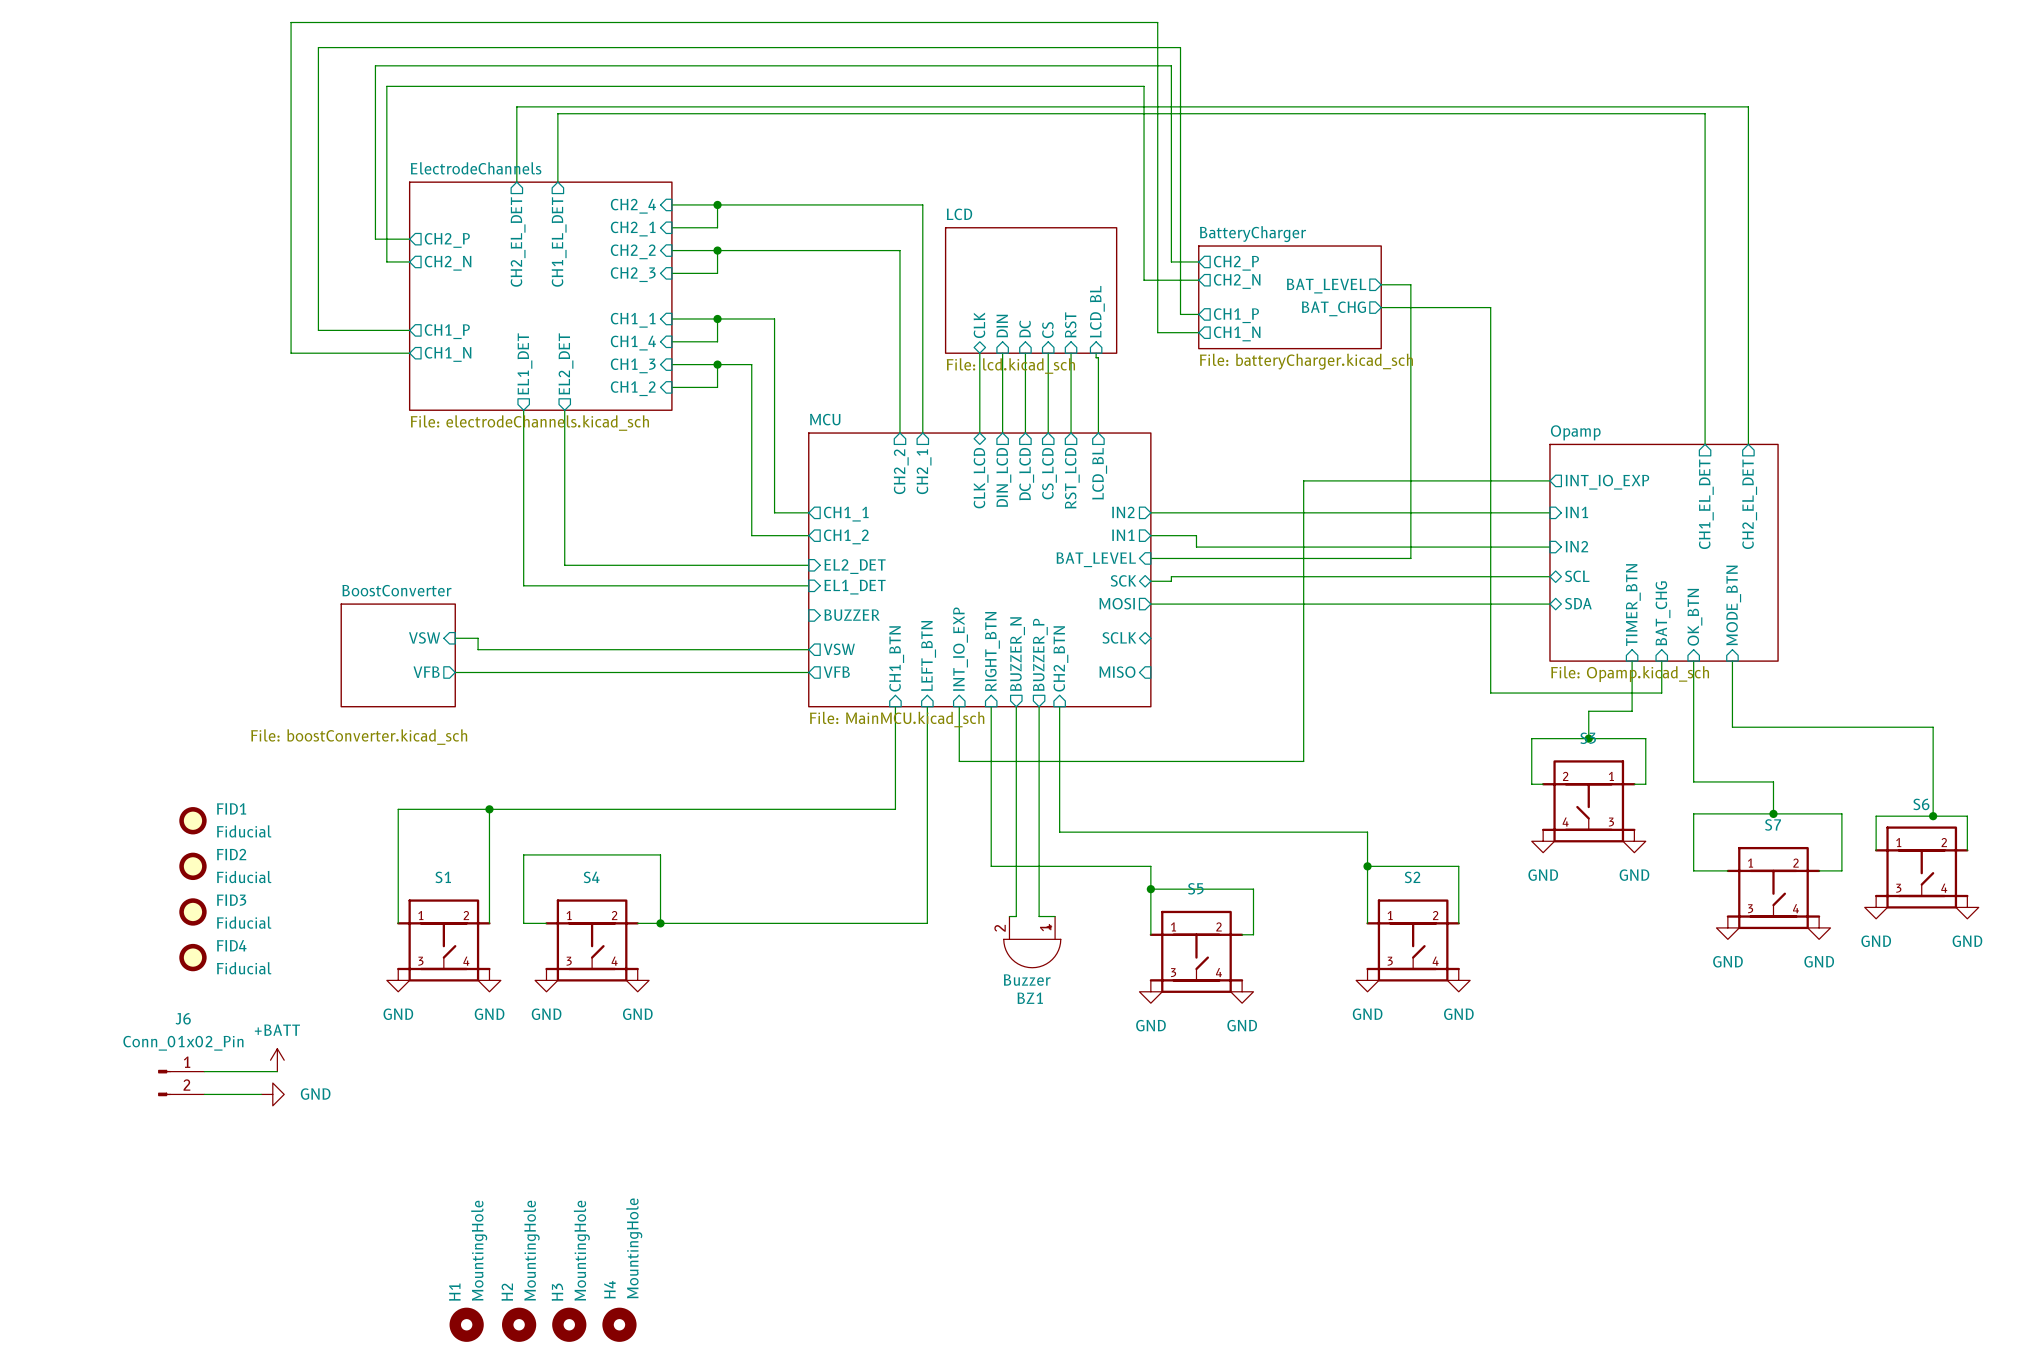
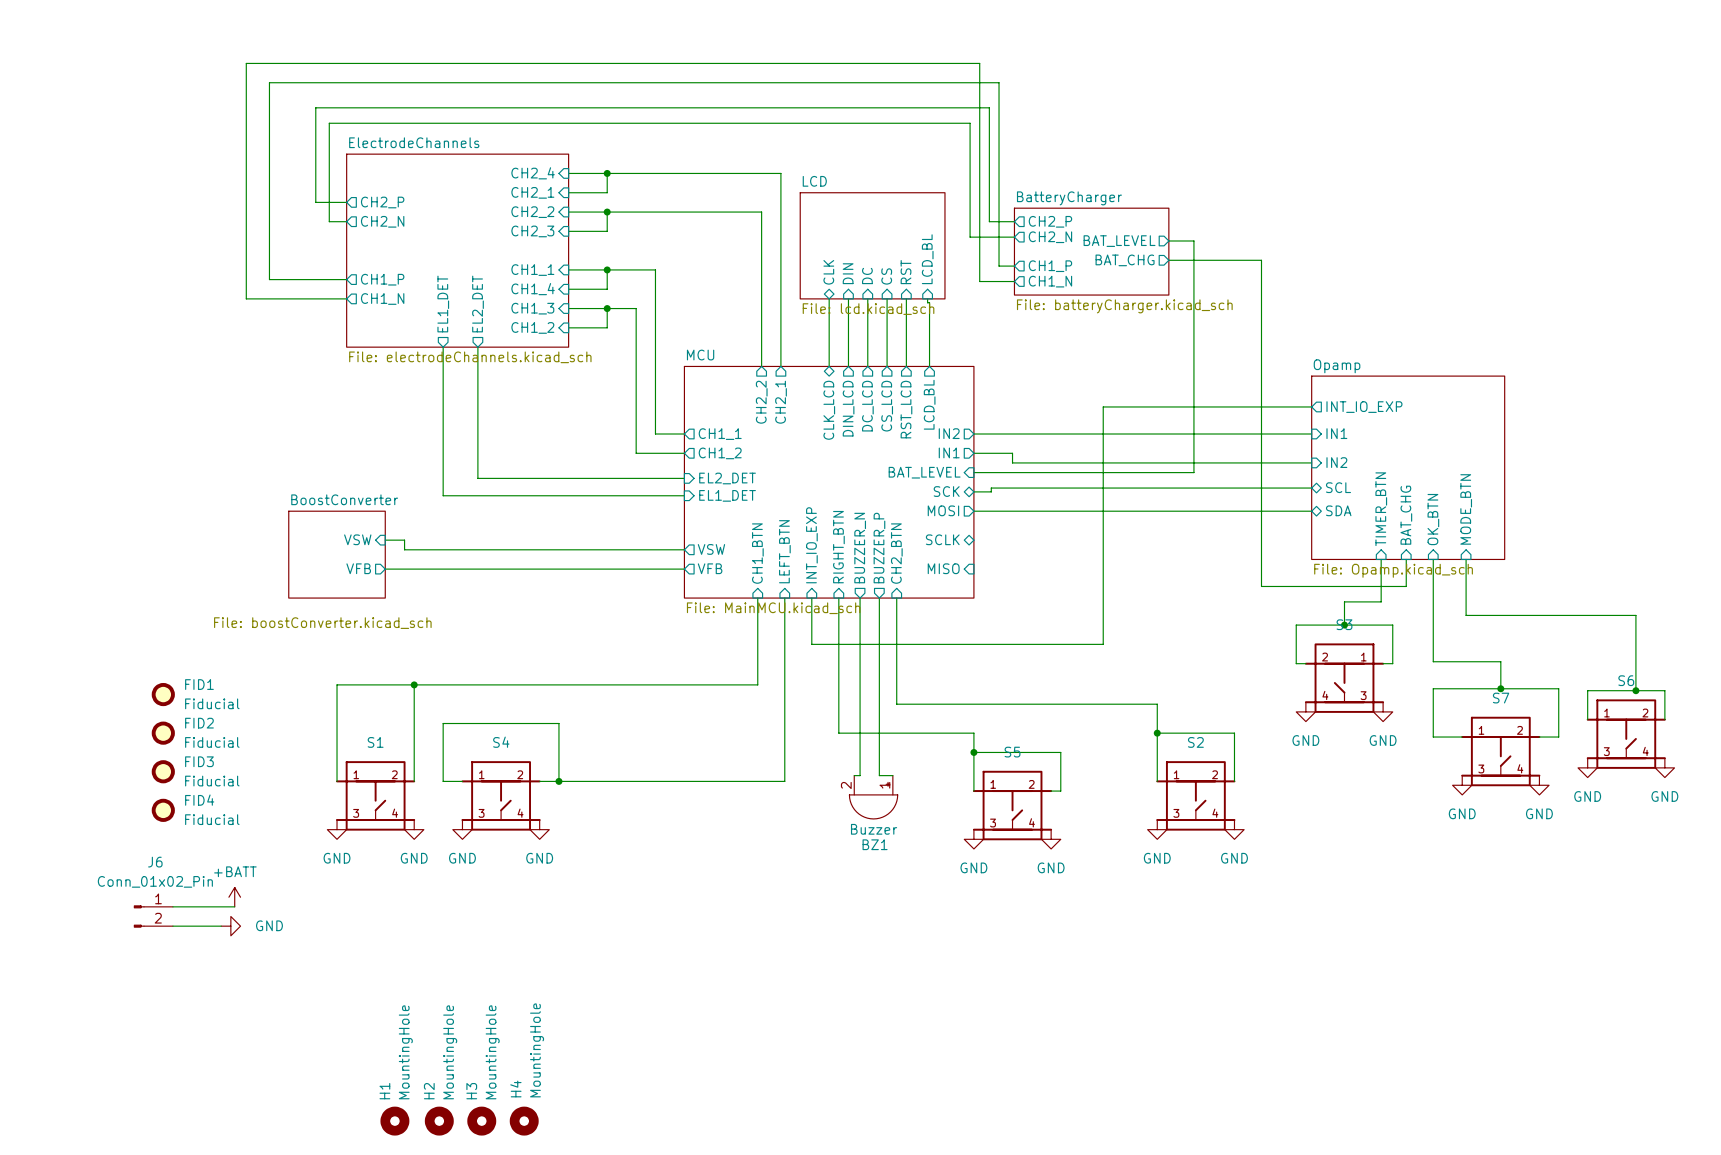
wire: (291, 74) (291, 22) (1157, 22) (1157, 74) -> (246, 63) (979, 63)
wire: (318, 97) (318, 47) (1180, 47) (1180, 97) -> (269, 82) (999, 82)
wire: (516, 182) (516, 106) (1748, 106) (1748, 444) -> none
wire: (557, 182) (557, 113) (1705, 113) (1705, 444) -> none
wire: (375, 239) (375, 65) (1171, 65) (1171, 261) -> (317, 202) (315, 202) (315, 107) (989, 107) (989, 221) (991, 221)
sheet pin: CH2_EL_DET (518, 242) -> none
sheet pin: CH1_EL_DET (559, 242) -> none
wire: (389, 261) (386, 261) (386, 86) (1144, 86) (1144, 280) (1146, 280) -> (329, 221) (329, 123) (970, 123) (970, 237)
sheet pin: CH1_EL_DET (1706, 504) -> none
sheet pin: CH2_EL_DET (1749, 504) -> none
sheet pin: BUZZER (852, 615) -> none

